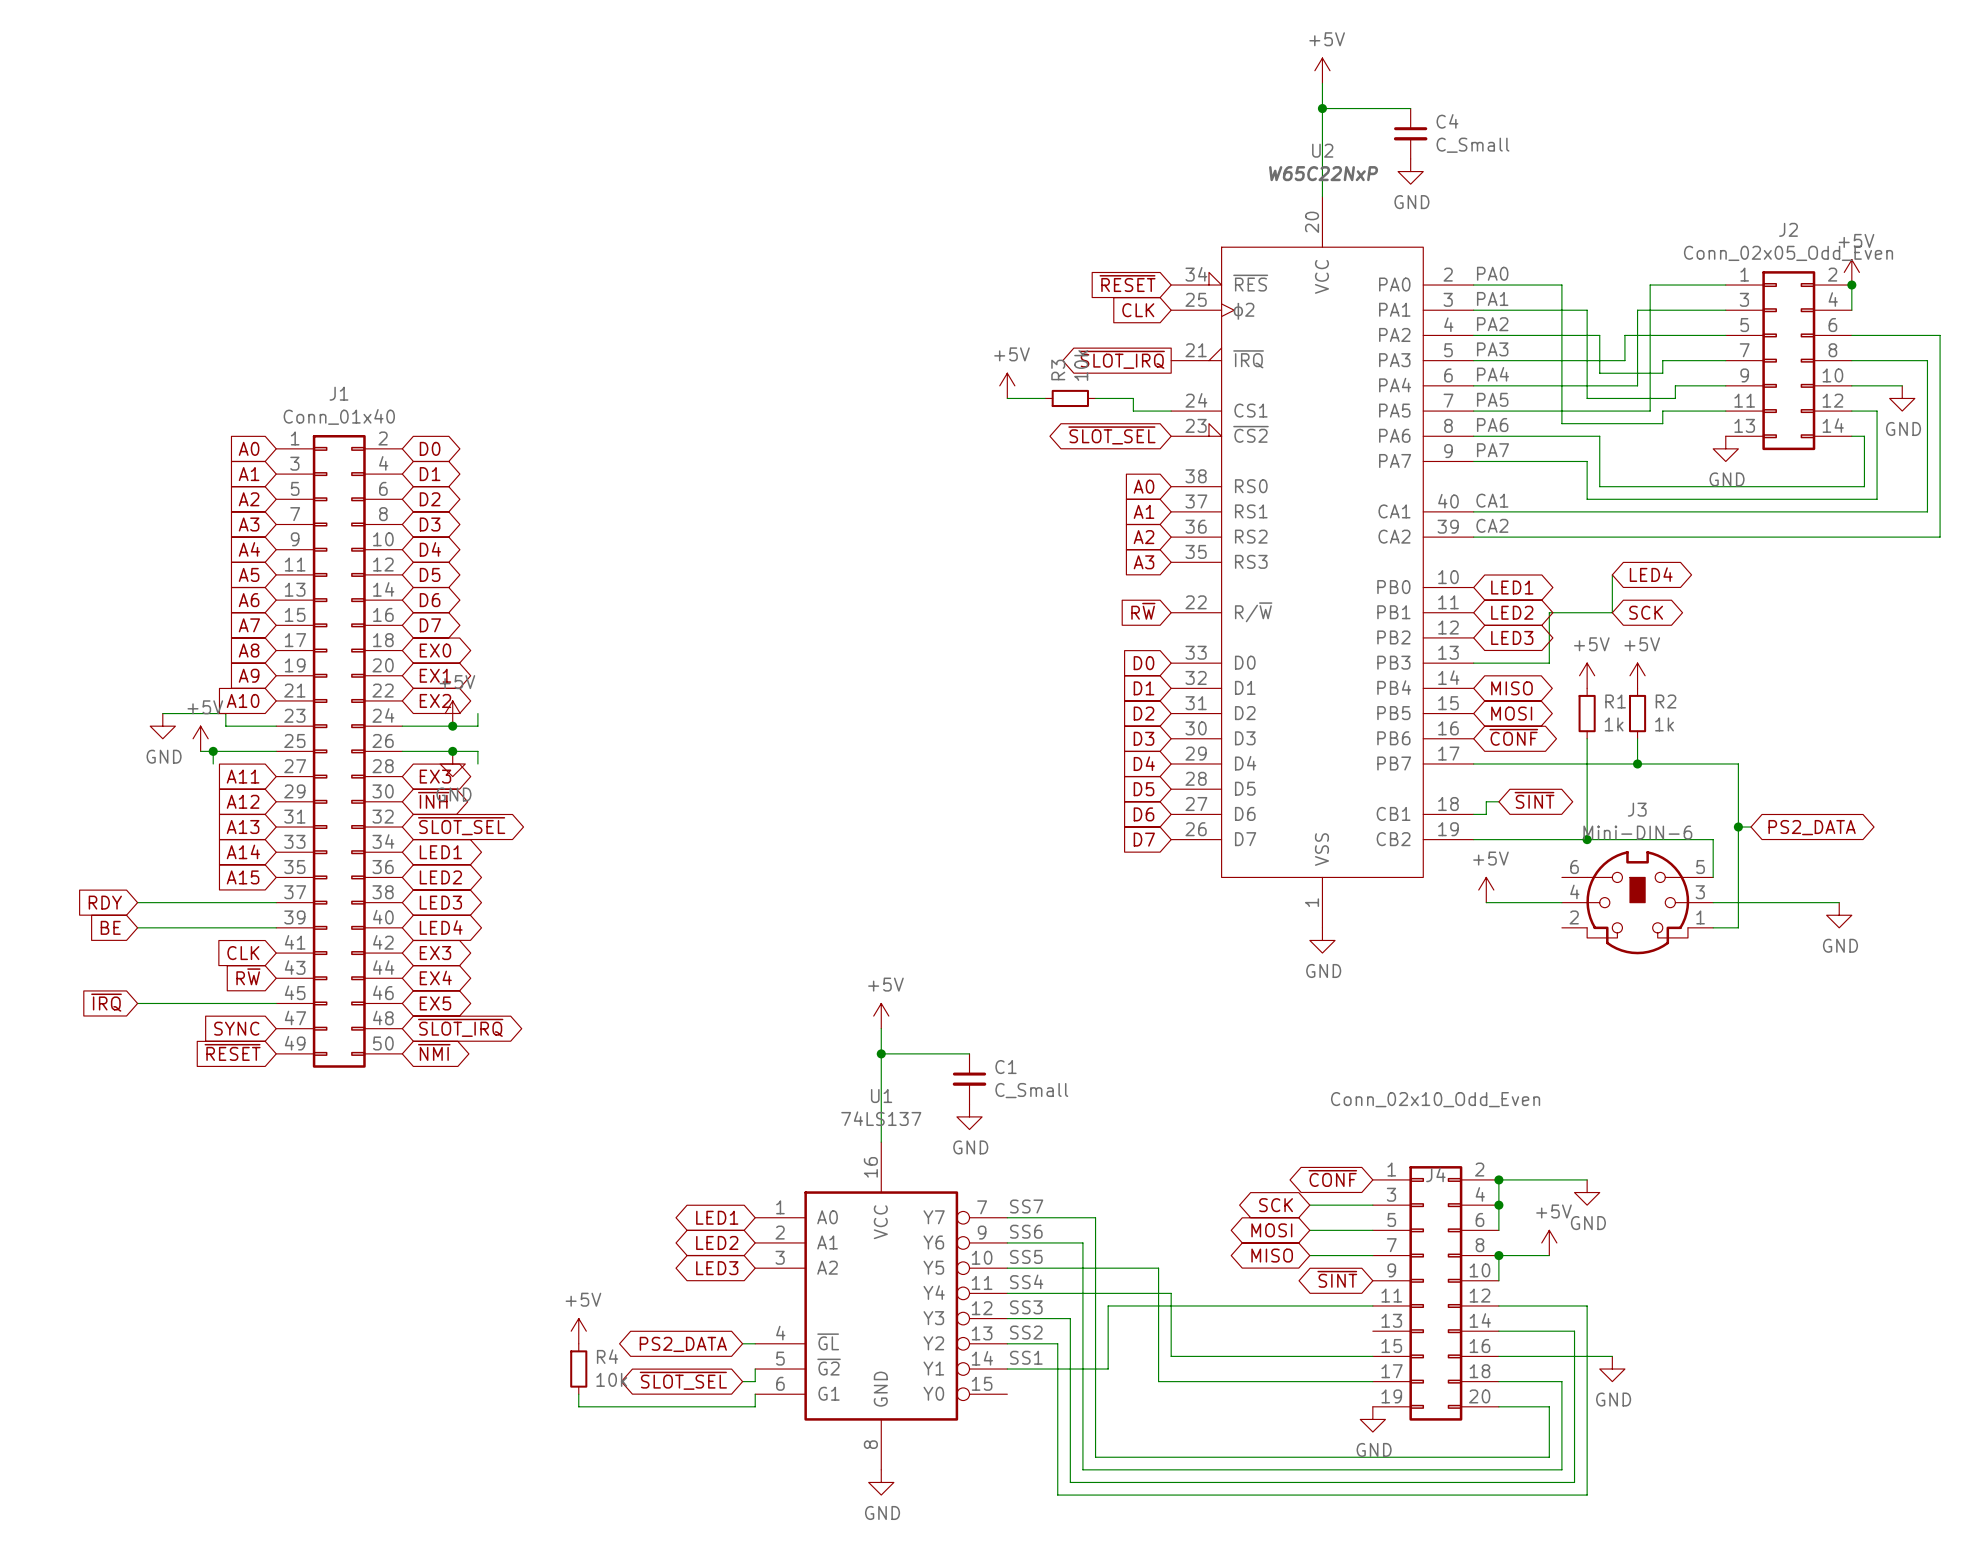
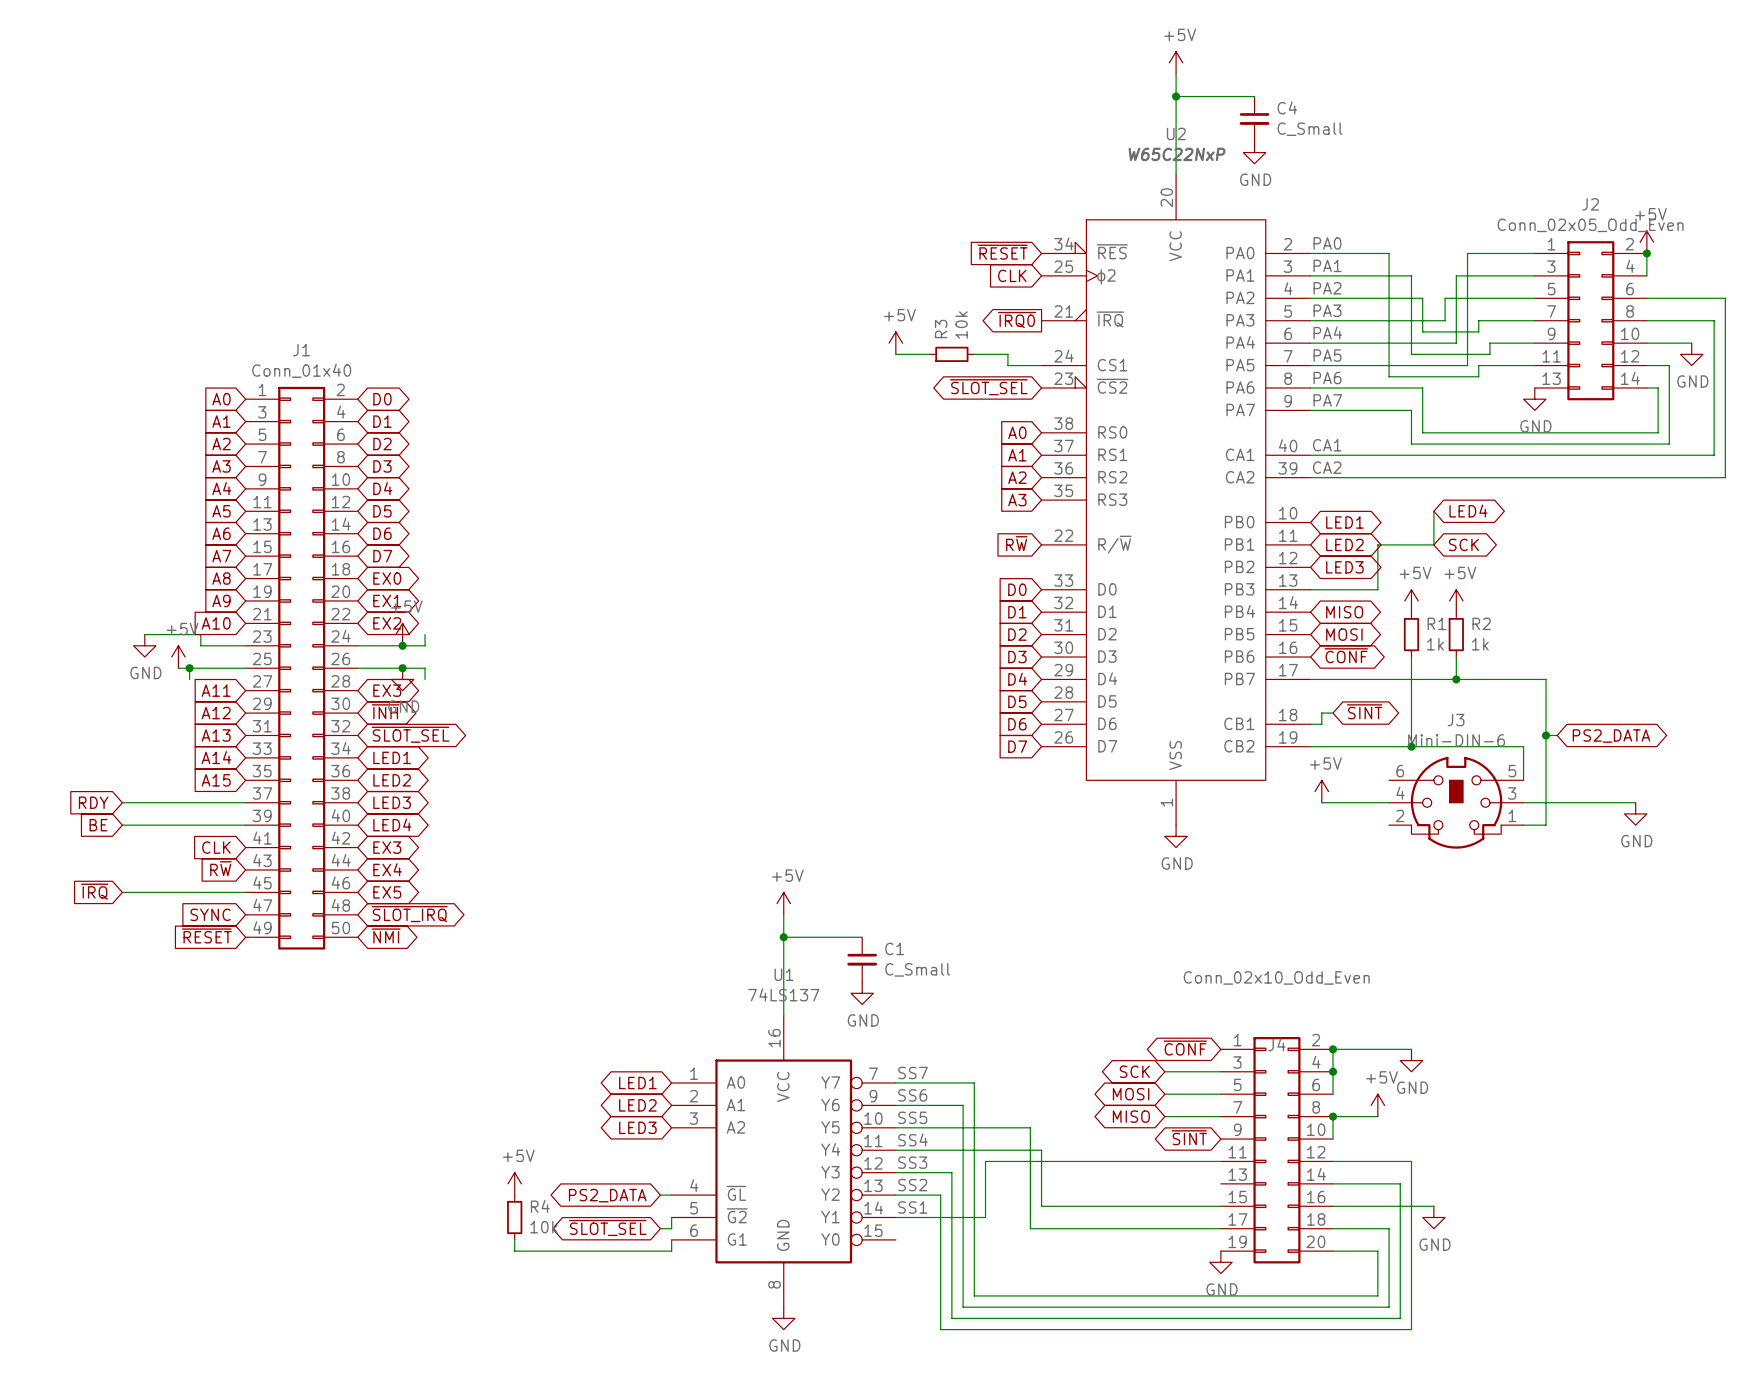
global label: ~{SLOT_IRQ} (1122, 359) -> ~{IRQ0} (1016, 319)

